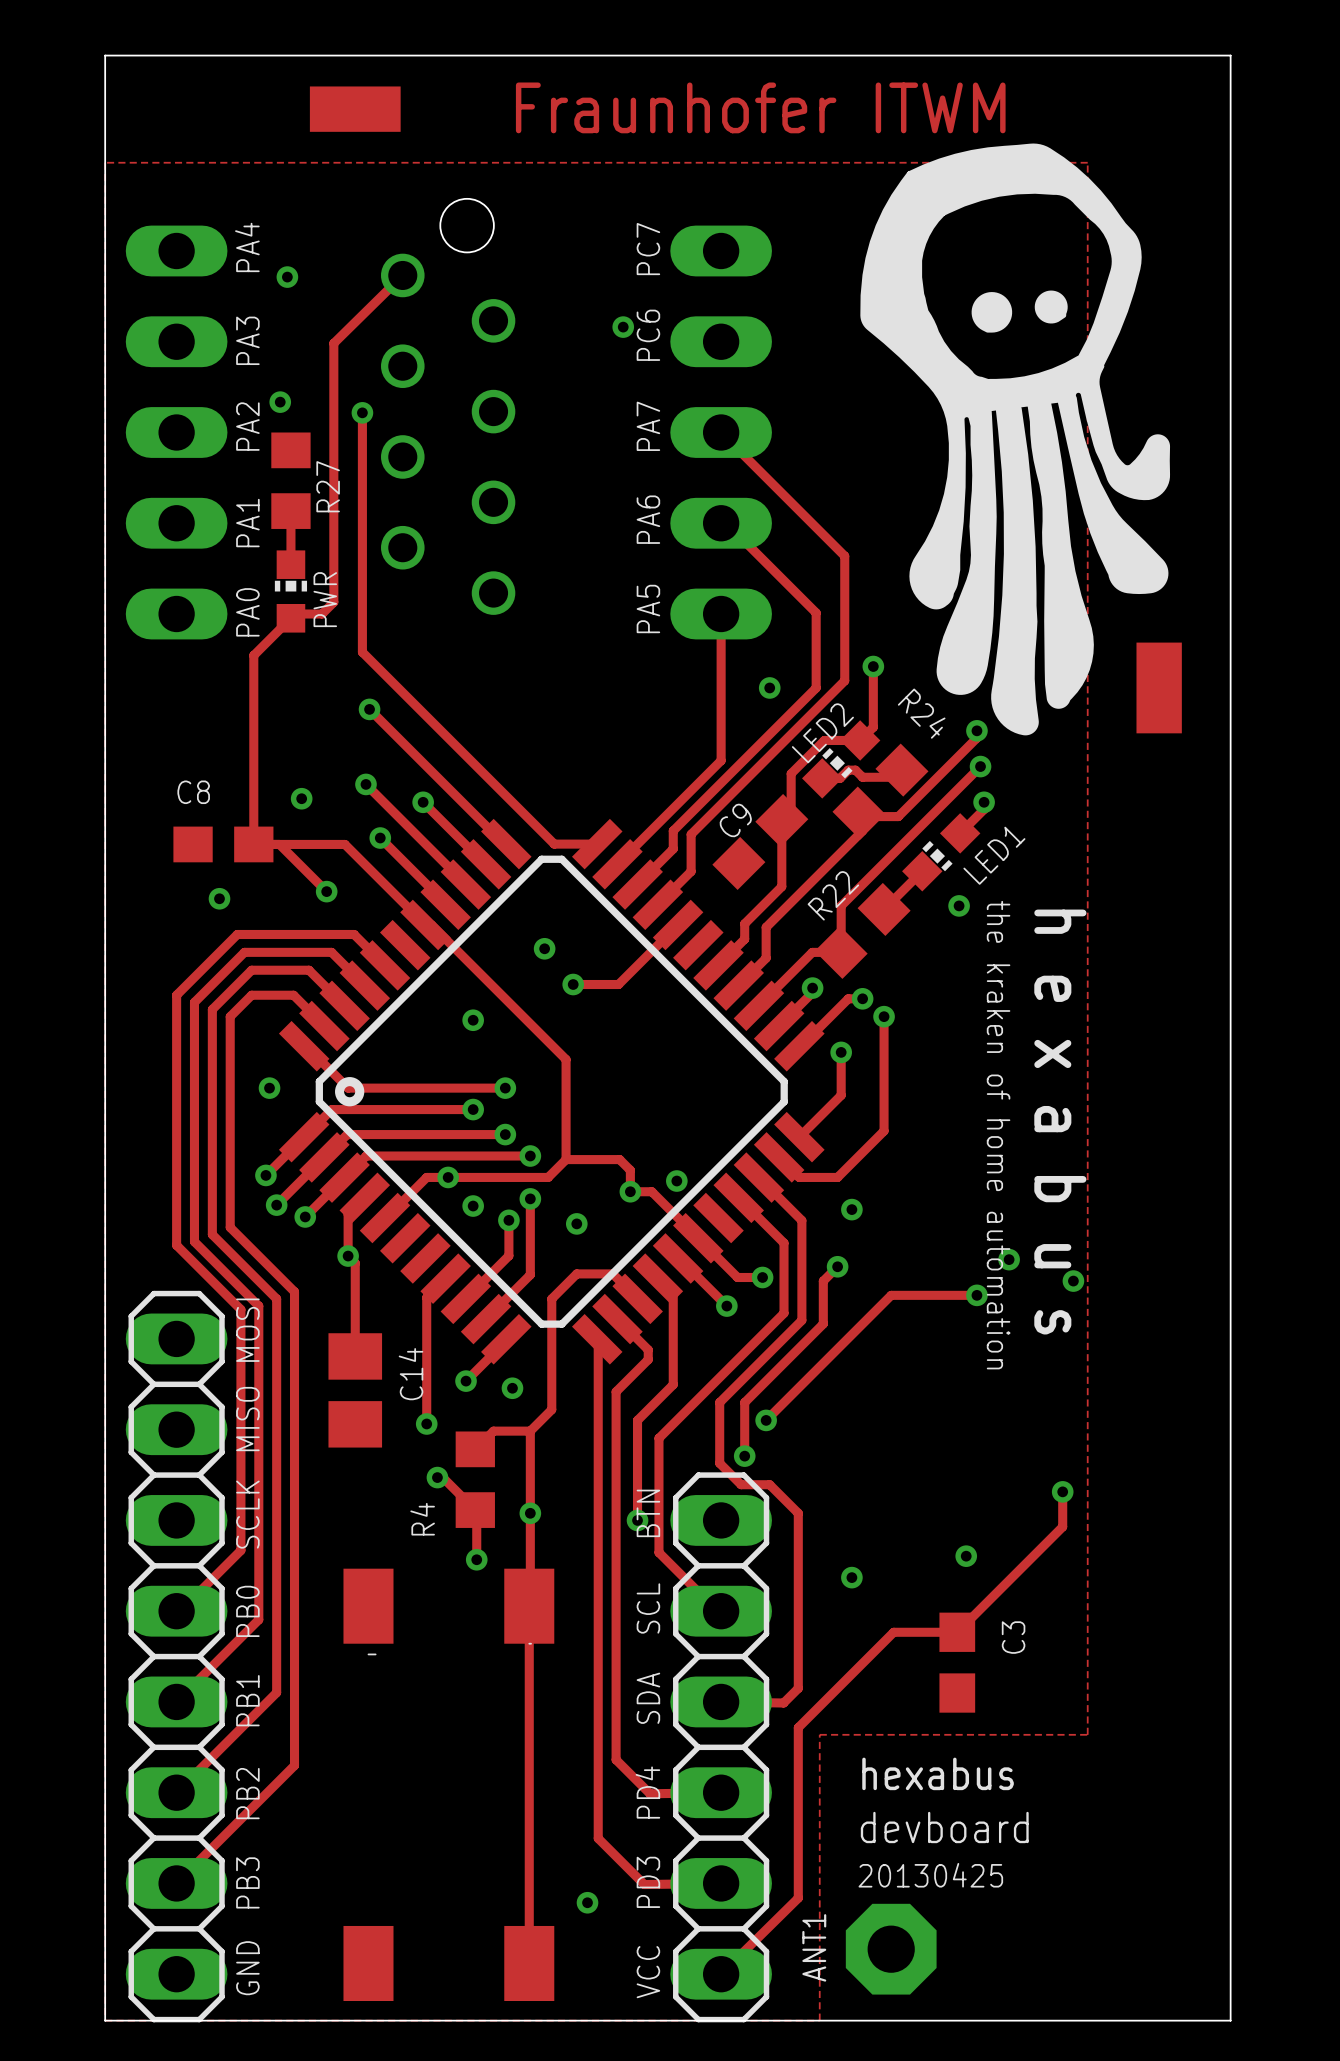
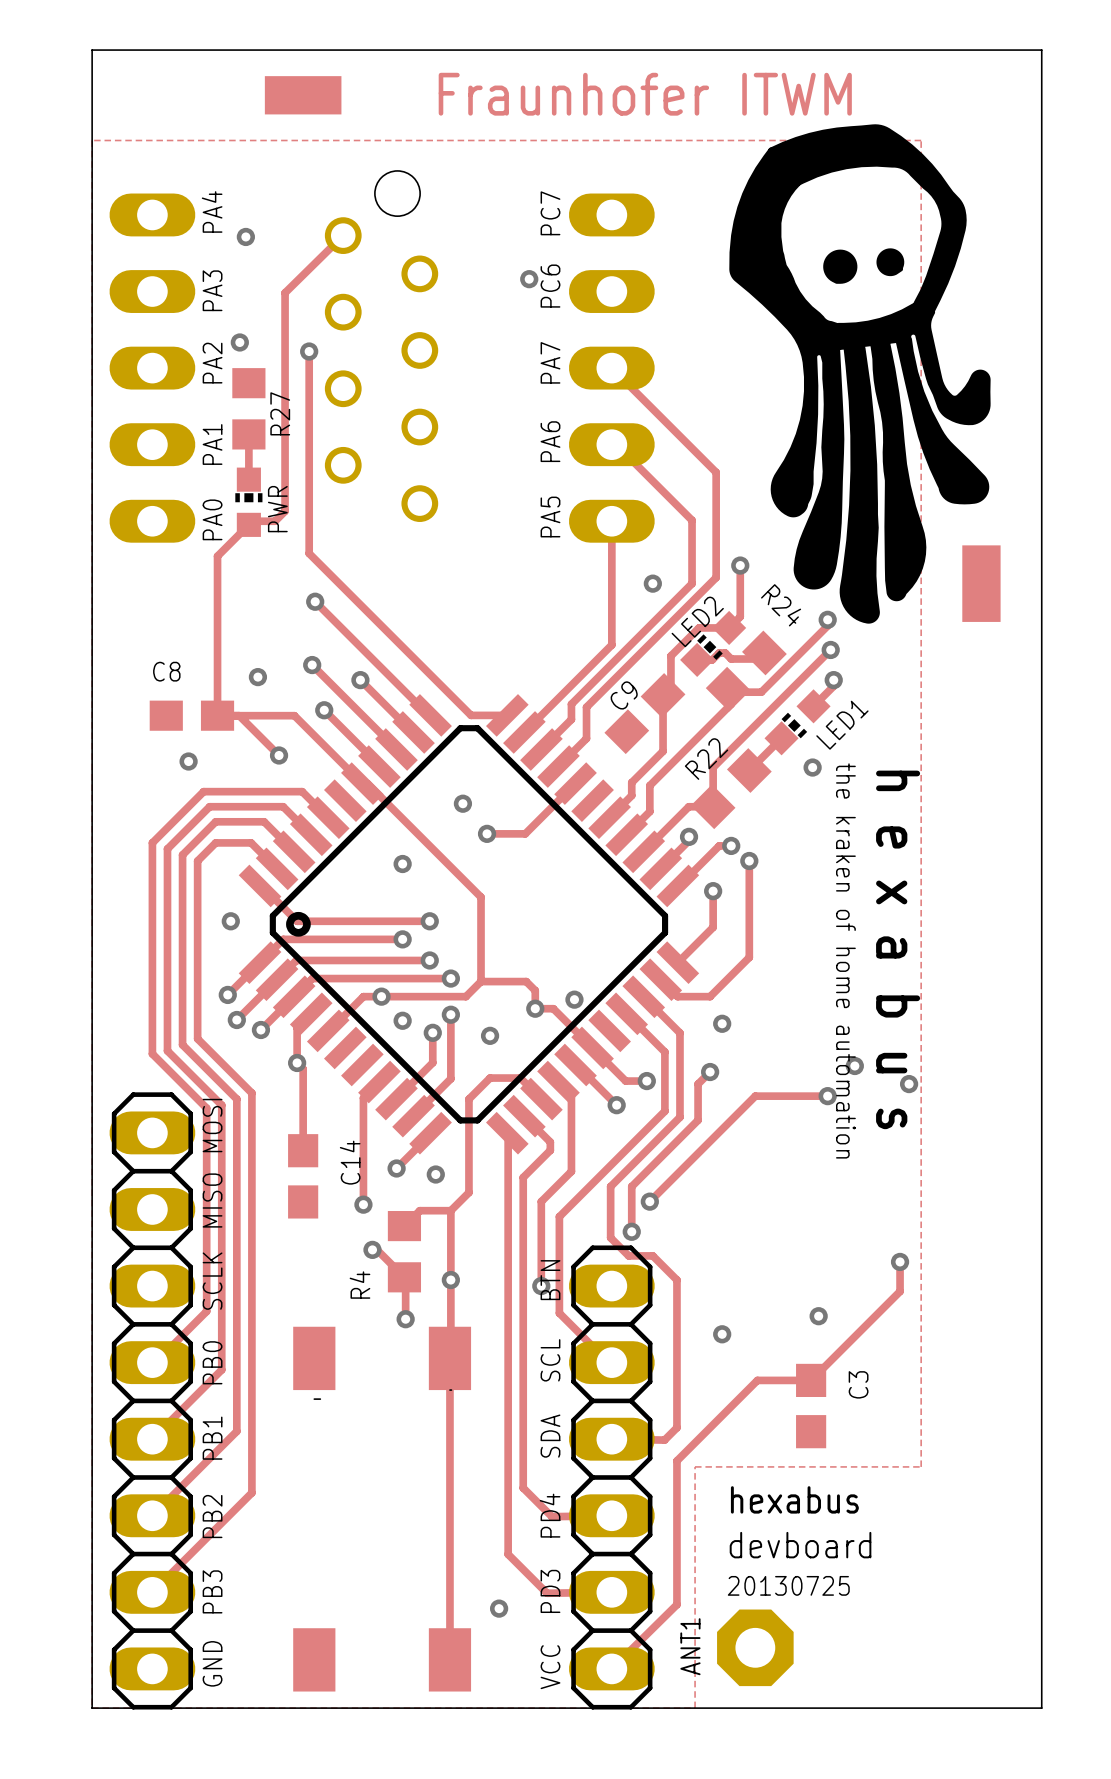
C14 footprint: [328, 1333, 383, 1448] -> [288, 1134, 319, 1219]
text: 20130425 (930, 1875) -> 20130725 (788, 1585)

